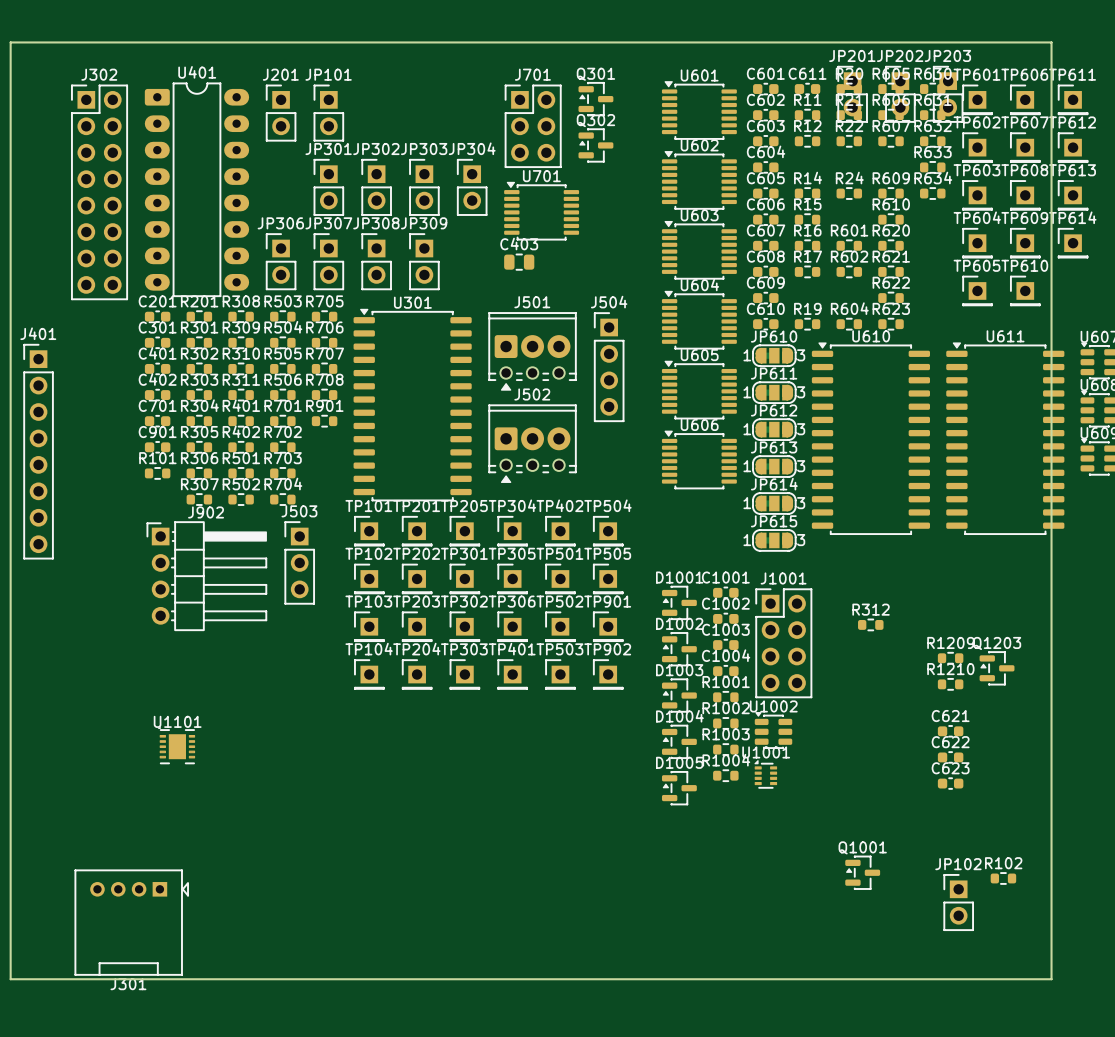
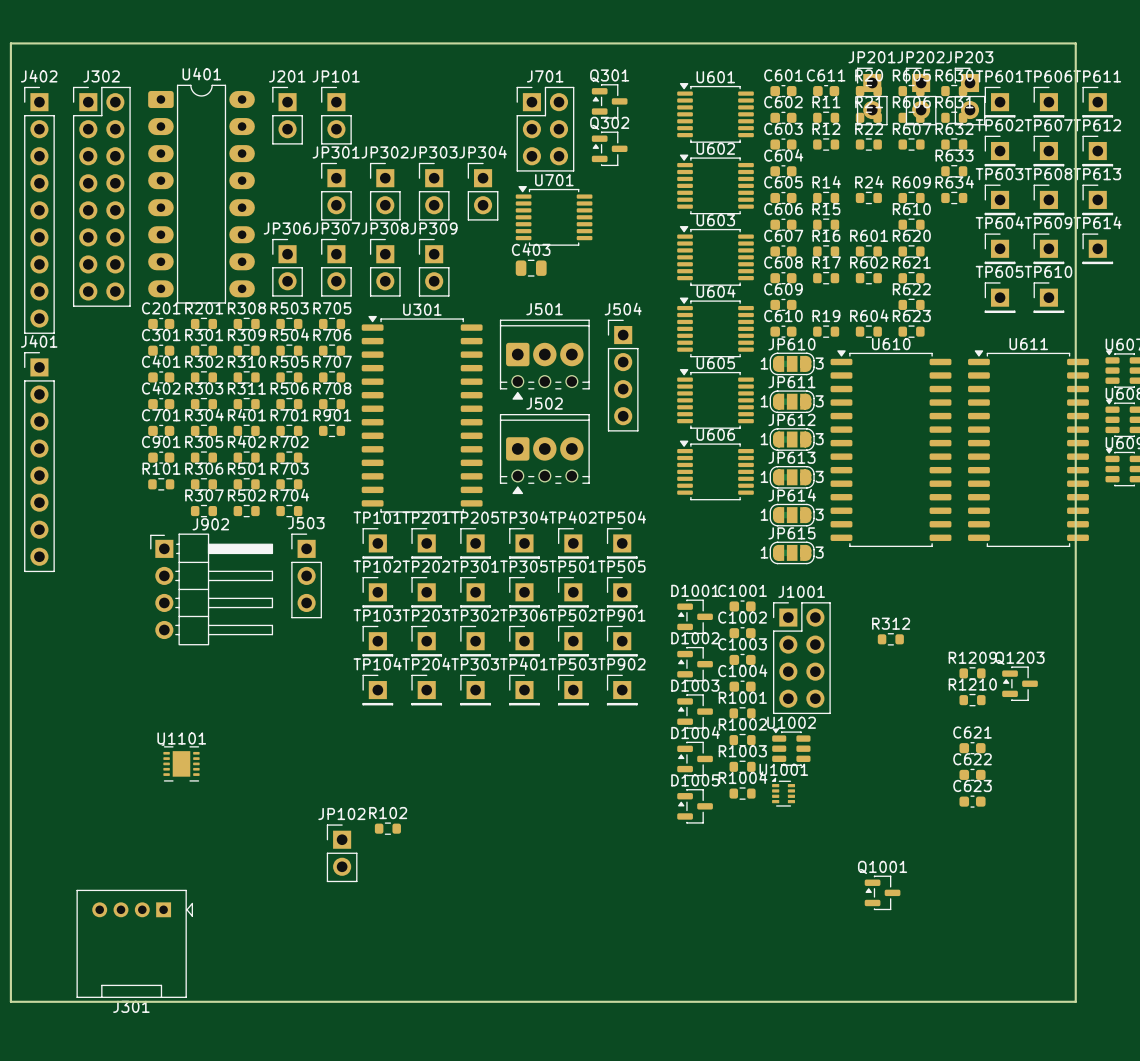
J402: none -> (39, 210)
R102 position: (1003, 878) -> (387, 828)
JP102 position: (958, 902) -> (342, 853)

